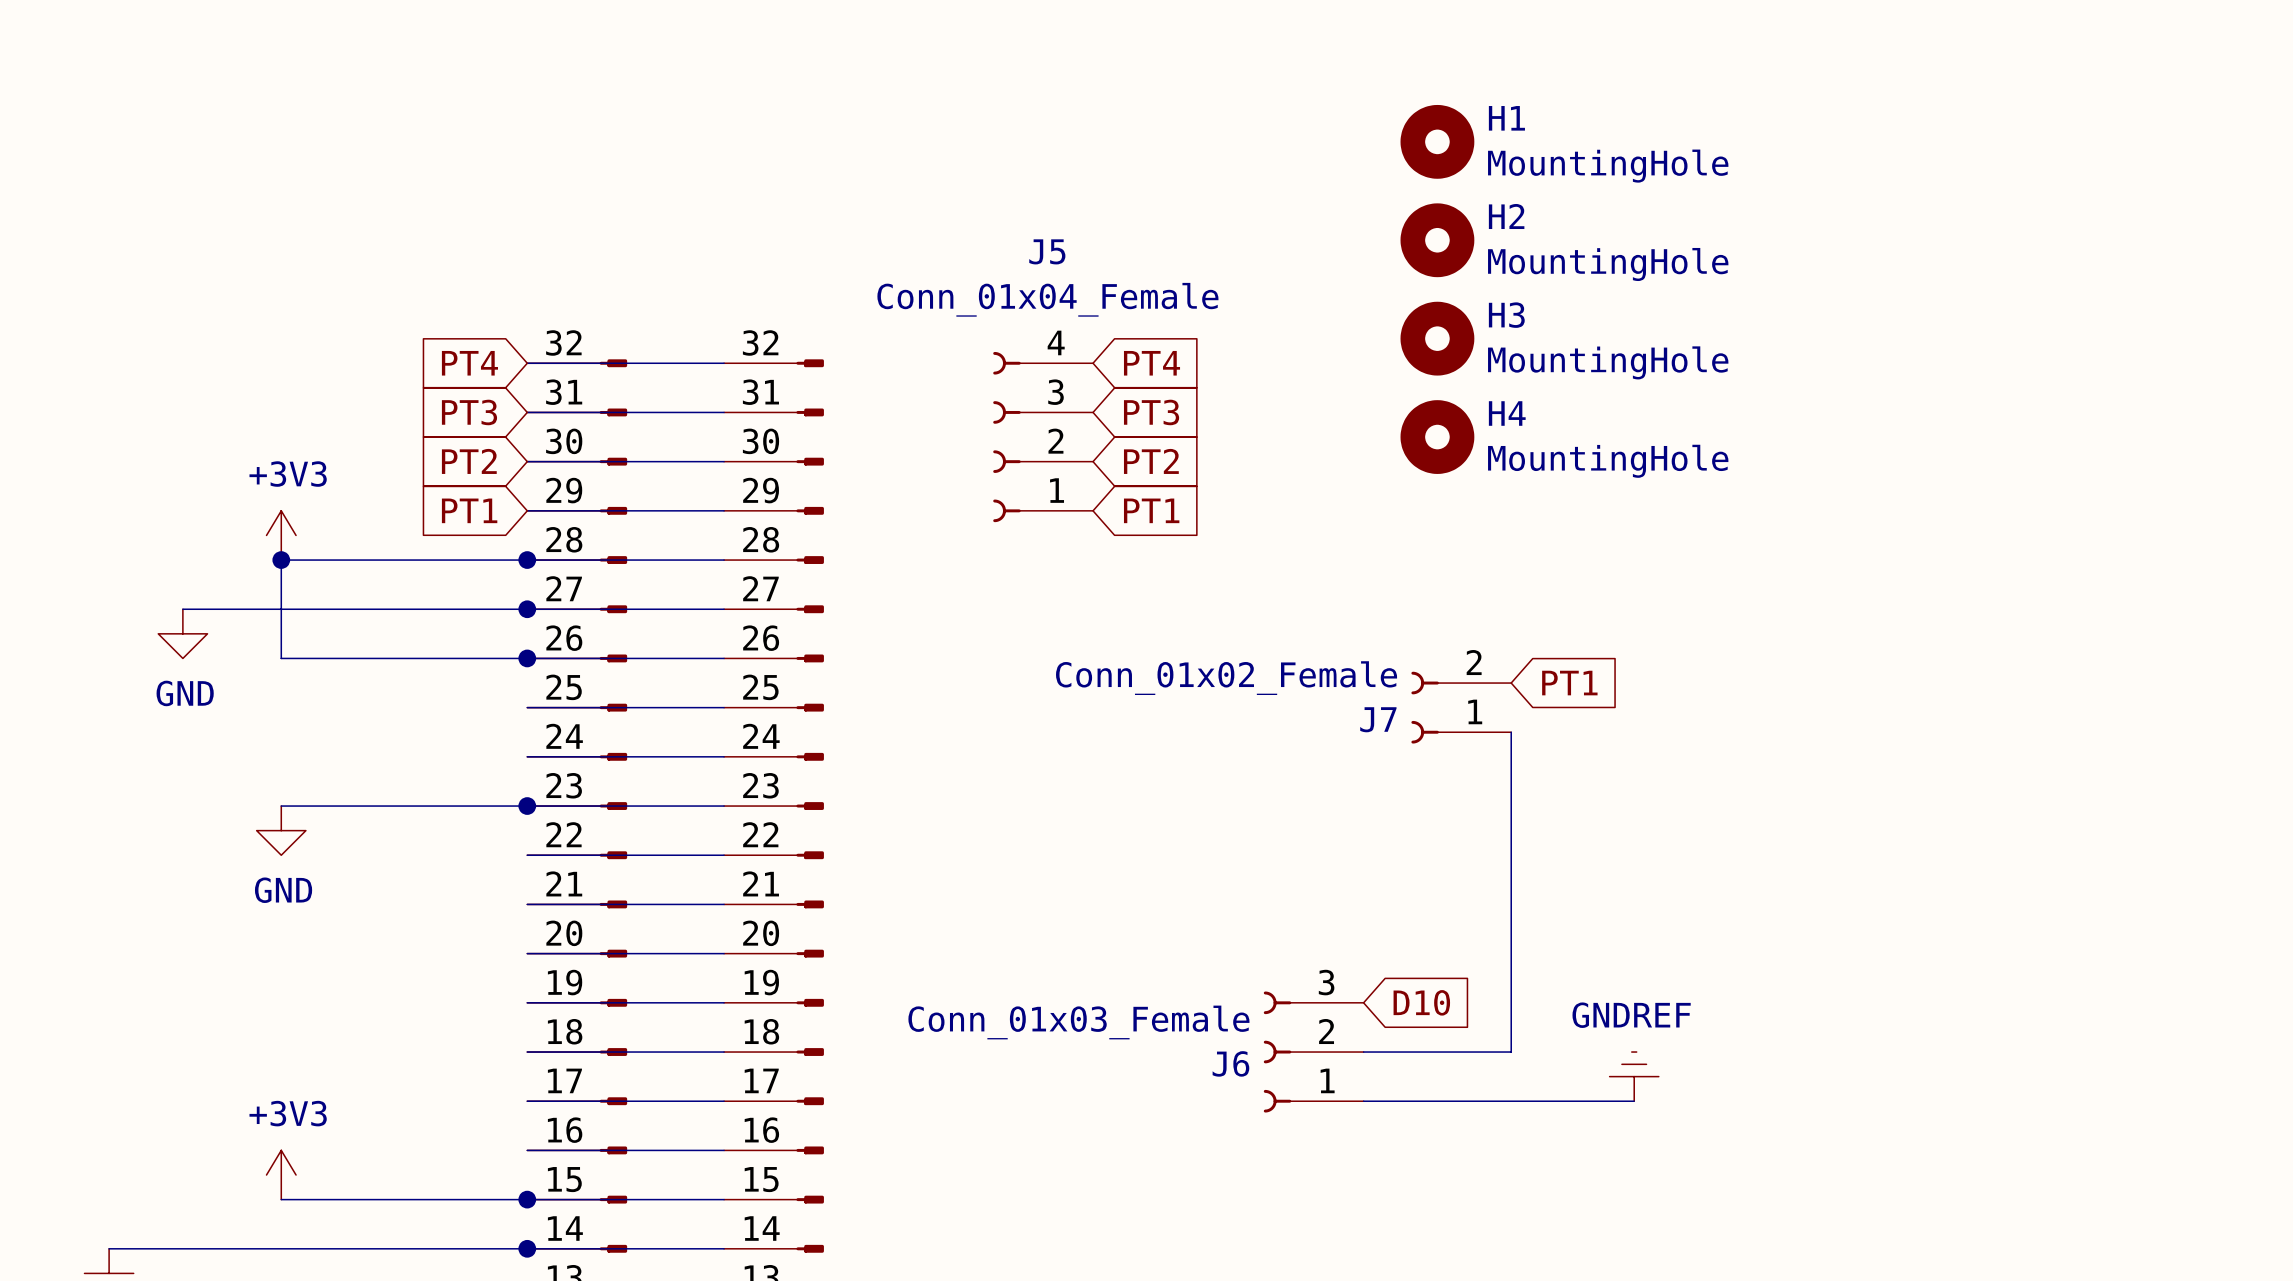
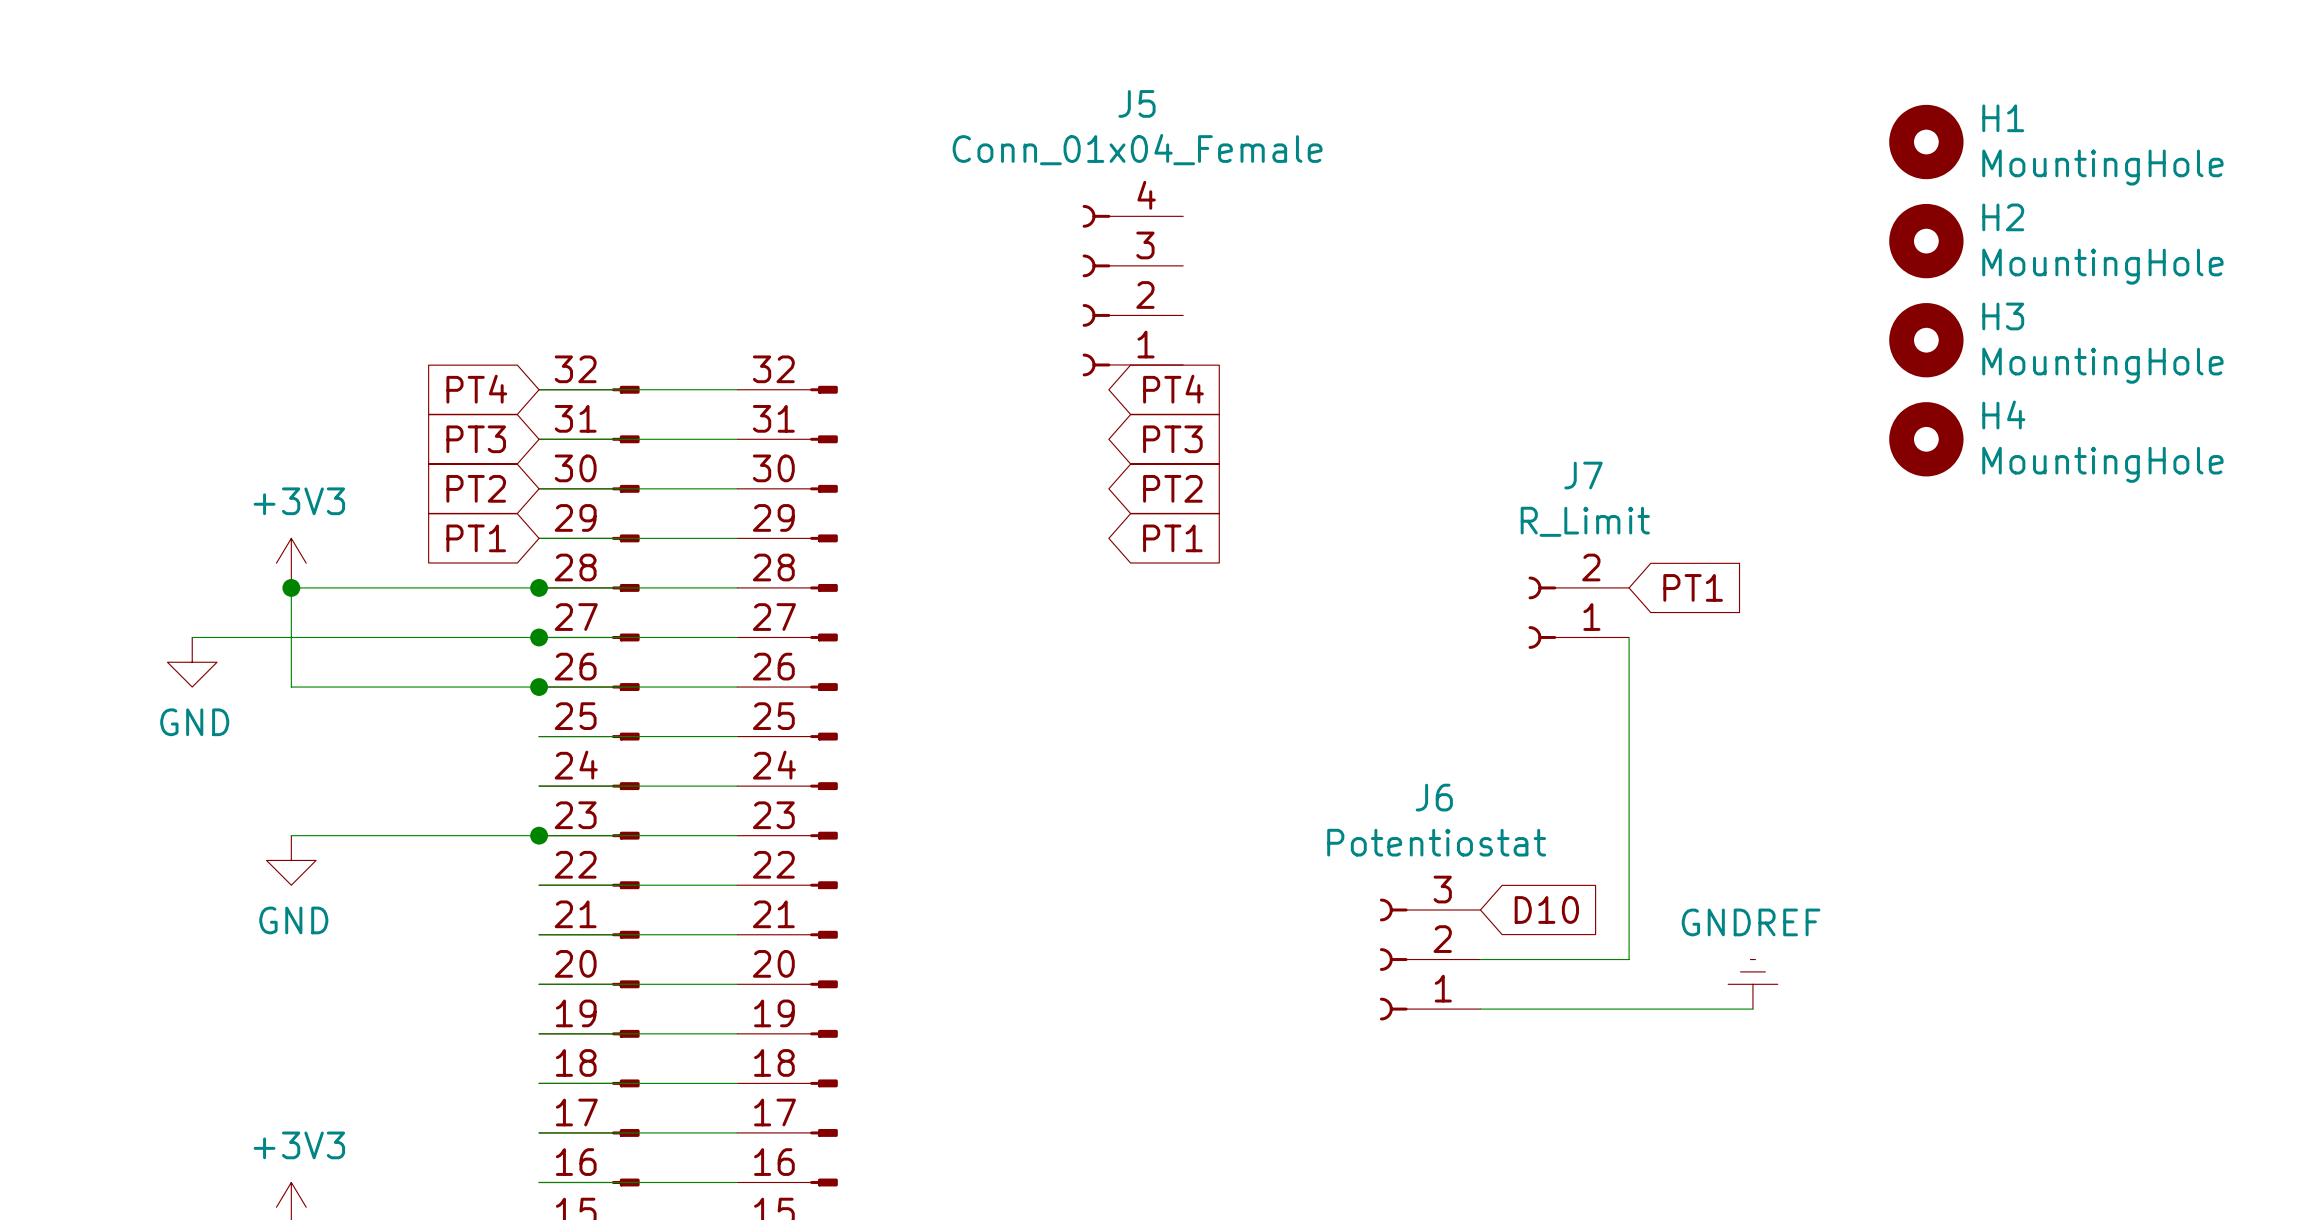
H1 position: (1437, 141) -> (1926, 142)
H2 position: (1437, 240) -> (1926, 241)
H3 position: (1437, 338) -> (1926, 340)
J5 position: (1043, 437) -> (1132, 290)
H4 position: (1437, 437) -> (1926, 439)
J7 value: Conn_01x02_Female (1226, 678) -> R_Limit (1585, 521)
global label position: PT1 (1569, 683) -> PT1 (1693, 587)
J7 position: (1461, 707) -> (1578, 612)
J7 name position: J7 (1378, 719) -> J7 (1583, 475)
wire: (1511, 732) (1511, 1052) (1363, 1052) -> (1629, 637) (1629, 959) (1480, 959)
global label position: D10 (1421, 1002) -> D10 (1546, 909)
J6 value: Conn_01x03_Female (1078, 1022) -> Potentiostat (1436, 842)
J6 position: (1313, 1052) -> (1430, 959)
J6 name position: J6 (1230, 1063) -> J6 (1434, 797)
power symbol position: GNDREF (1634, 1076) -> GNDREF (1752, 984)
wire: (1363, 1101) (1634, 1101) -> (1480, 1009) (1752, 1009)

